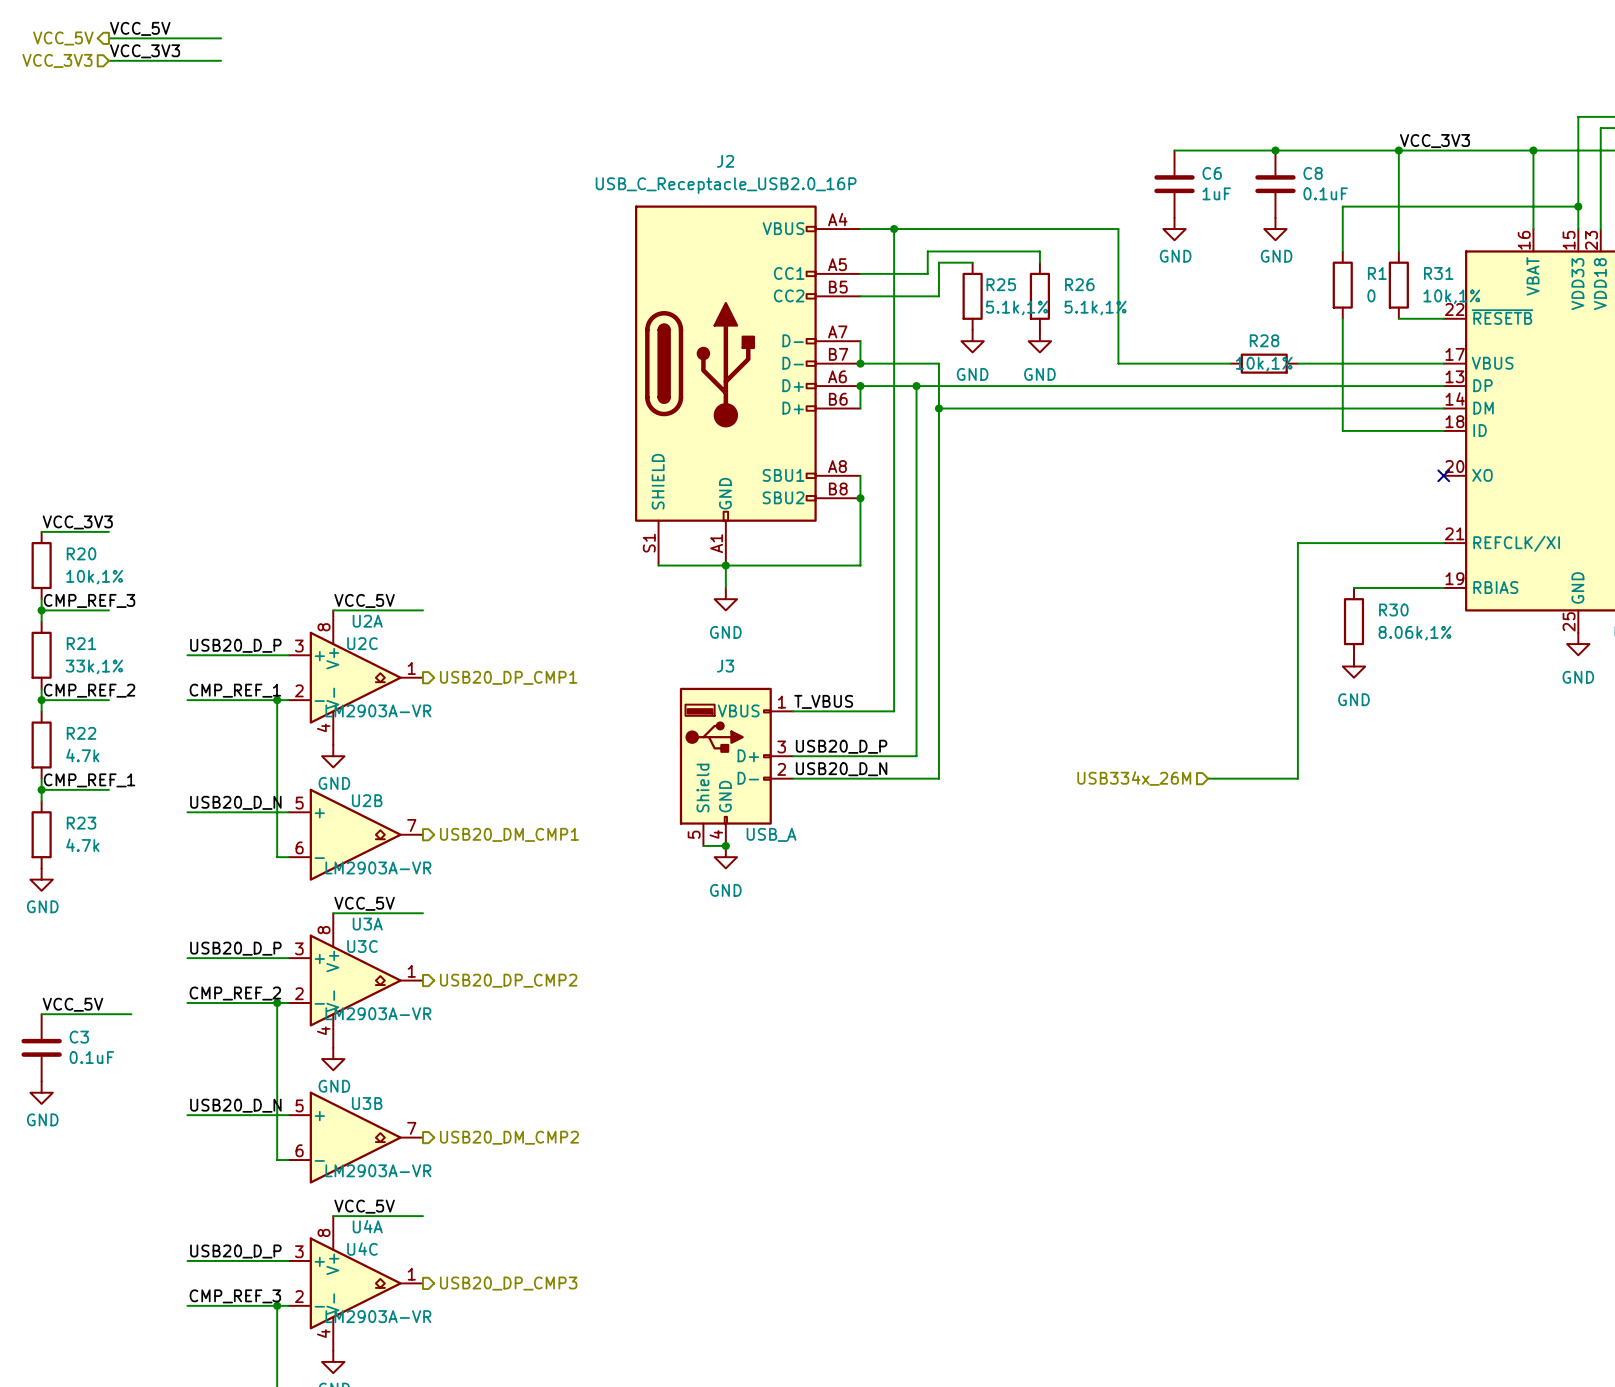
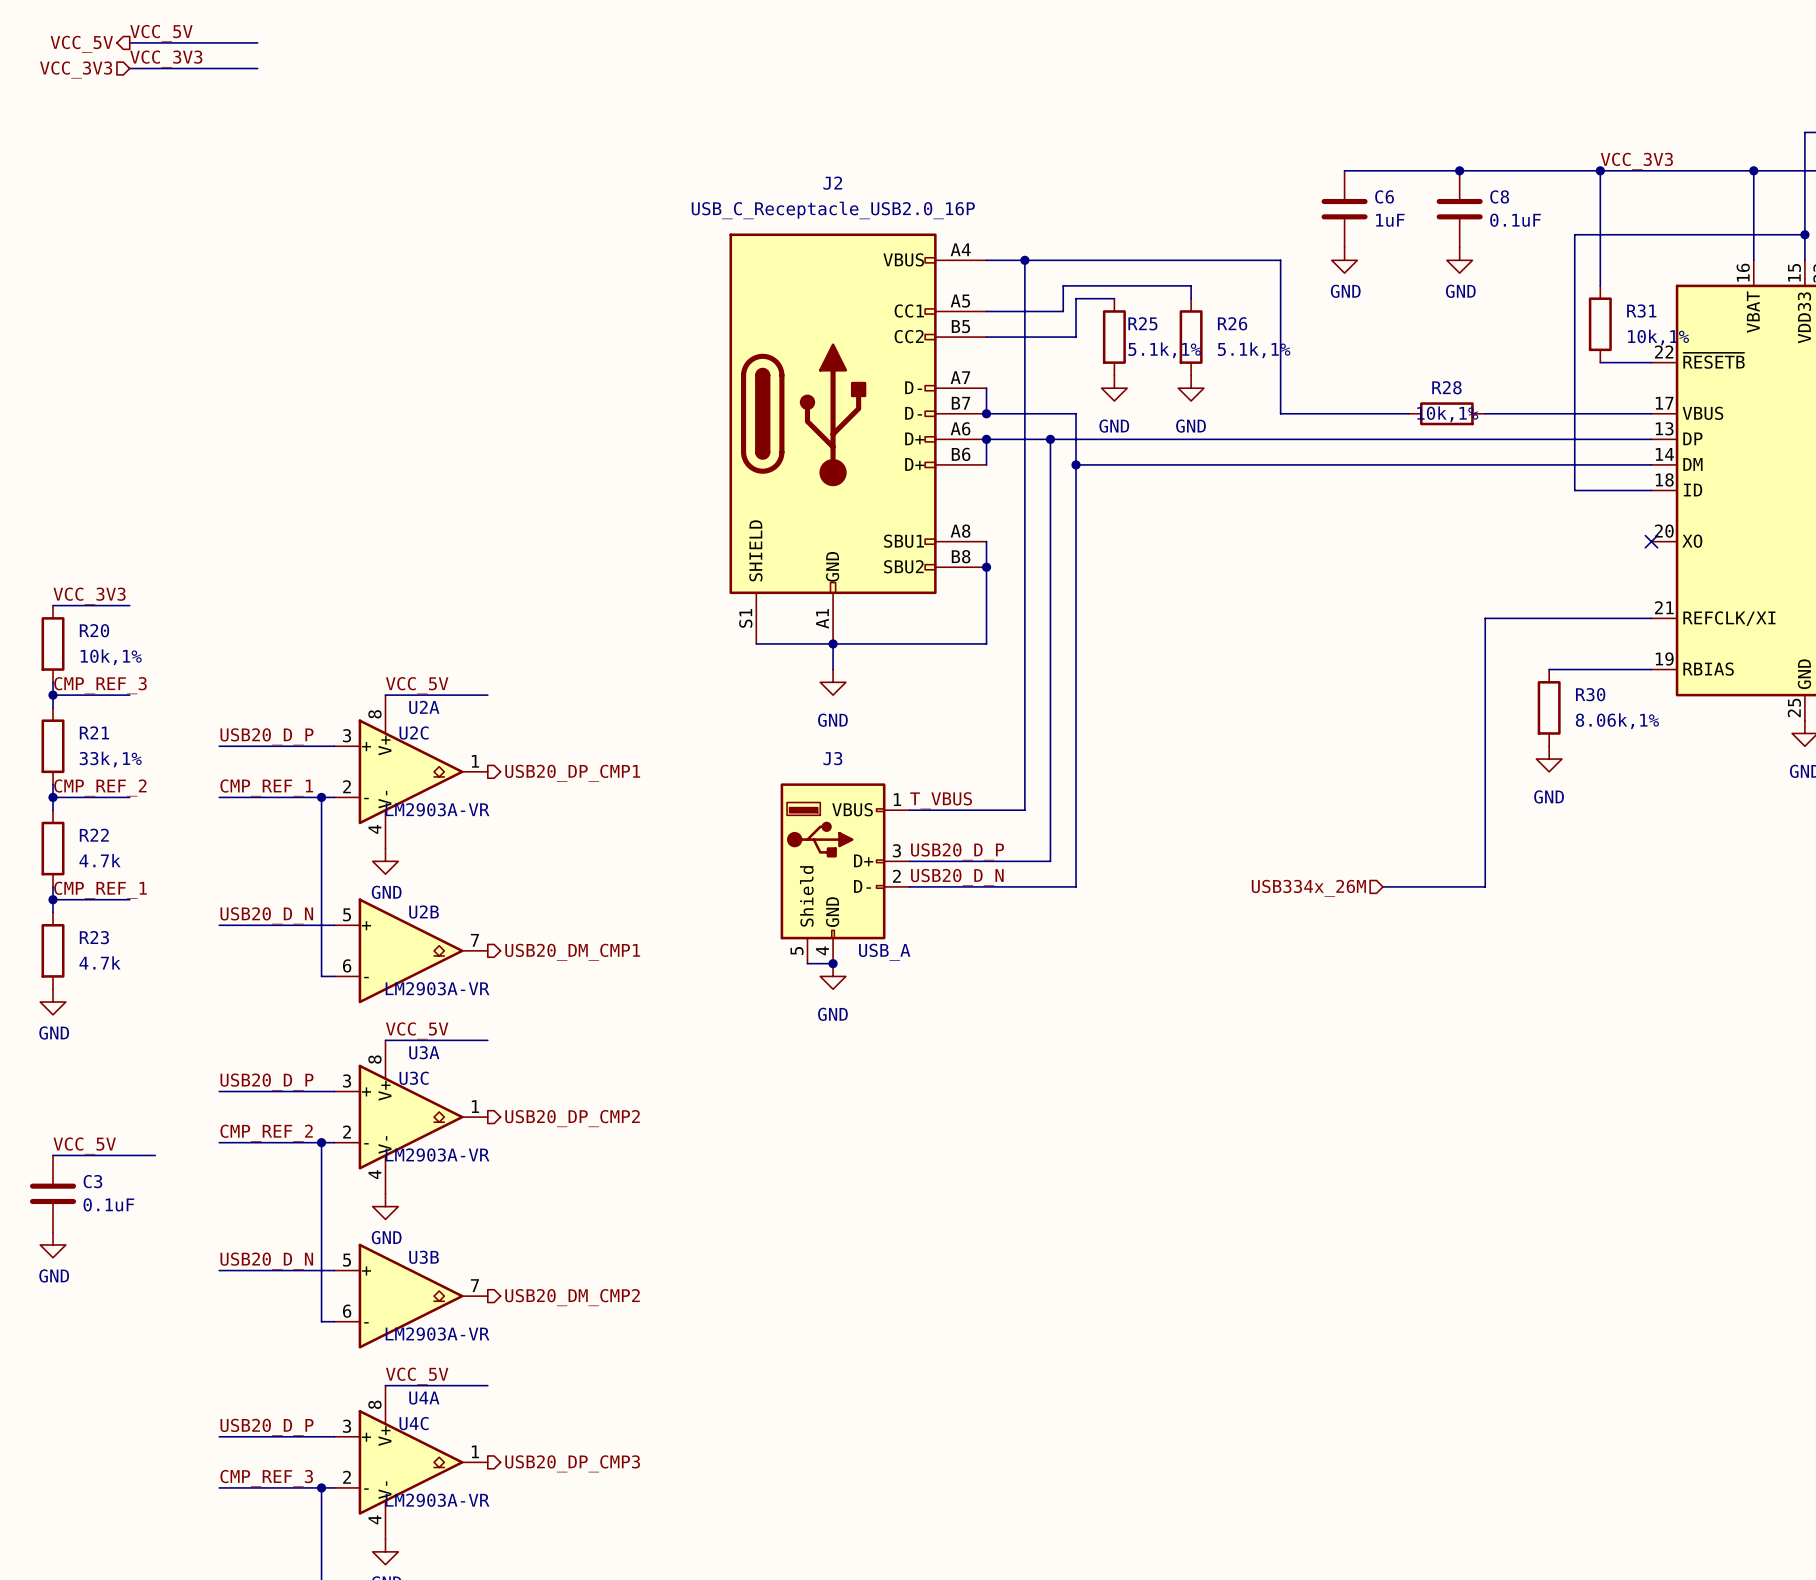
wire: (1376, 206) (1342, 206) (1342, 251) -> none
R1: 0 (1342, 285) -> none
wire: (1342, 318) (1342, 430) (1376, 430) -> (1574, 234) (1574, 490)

